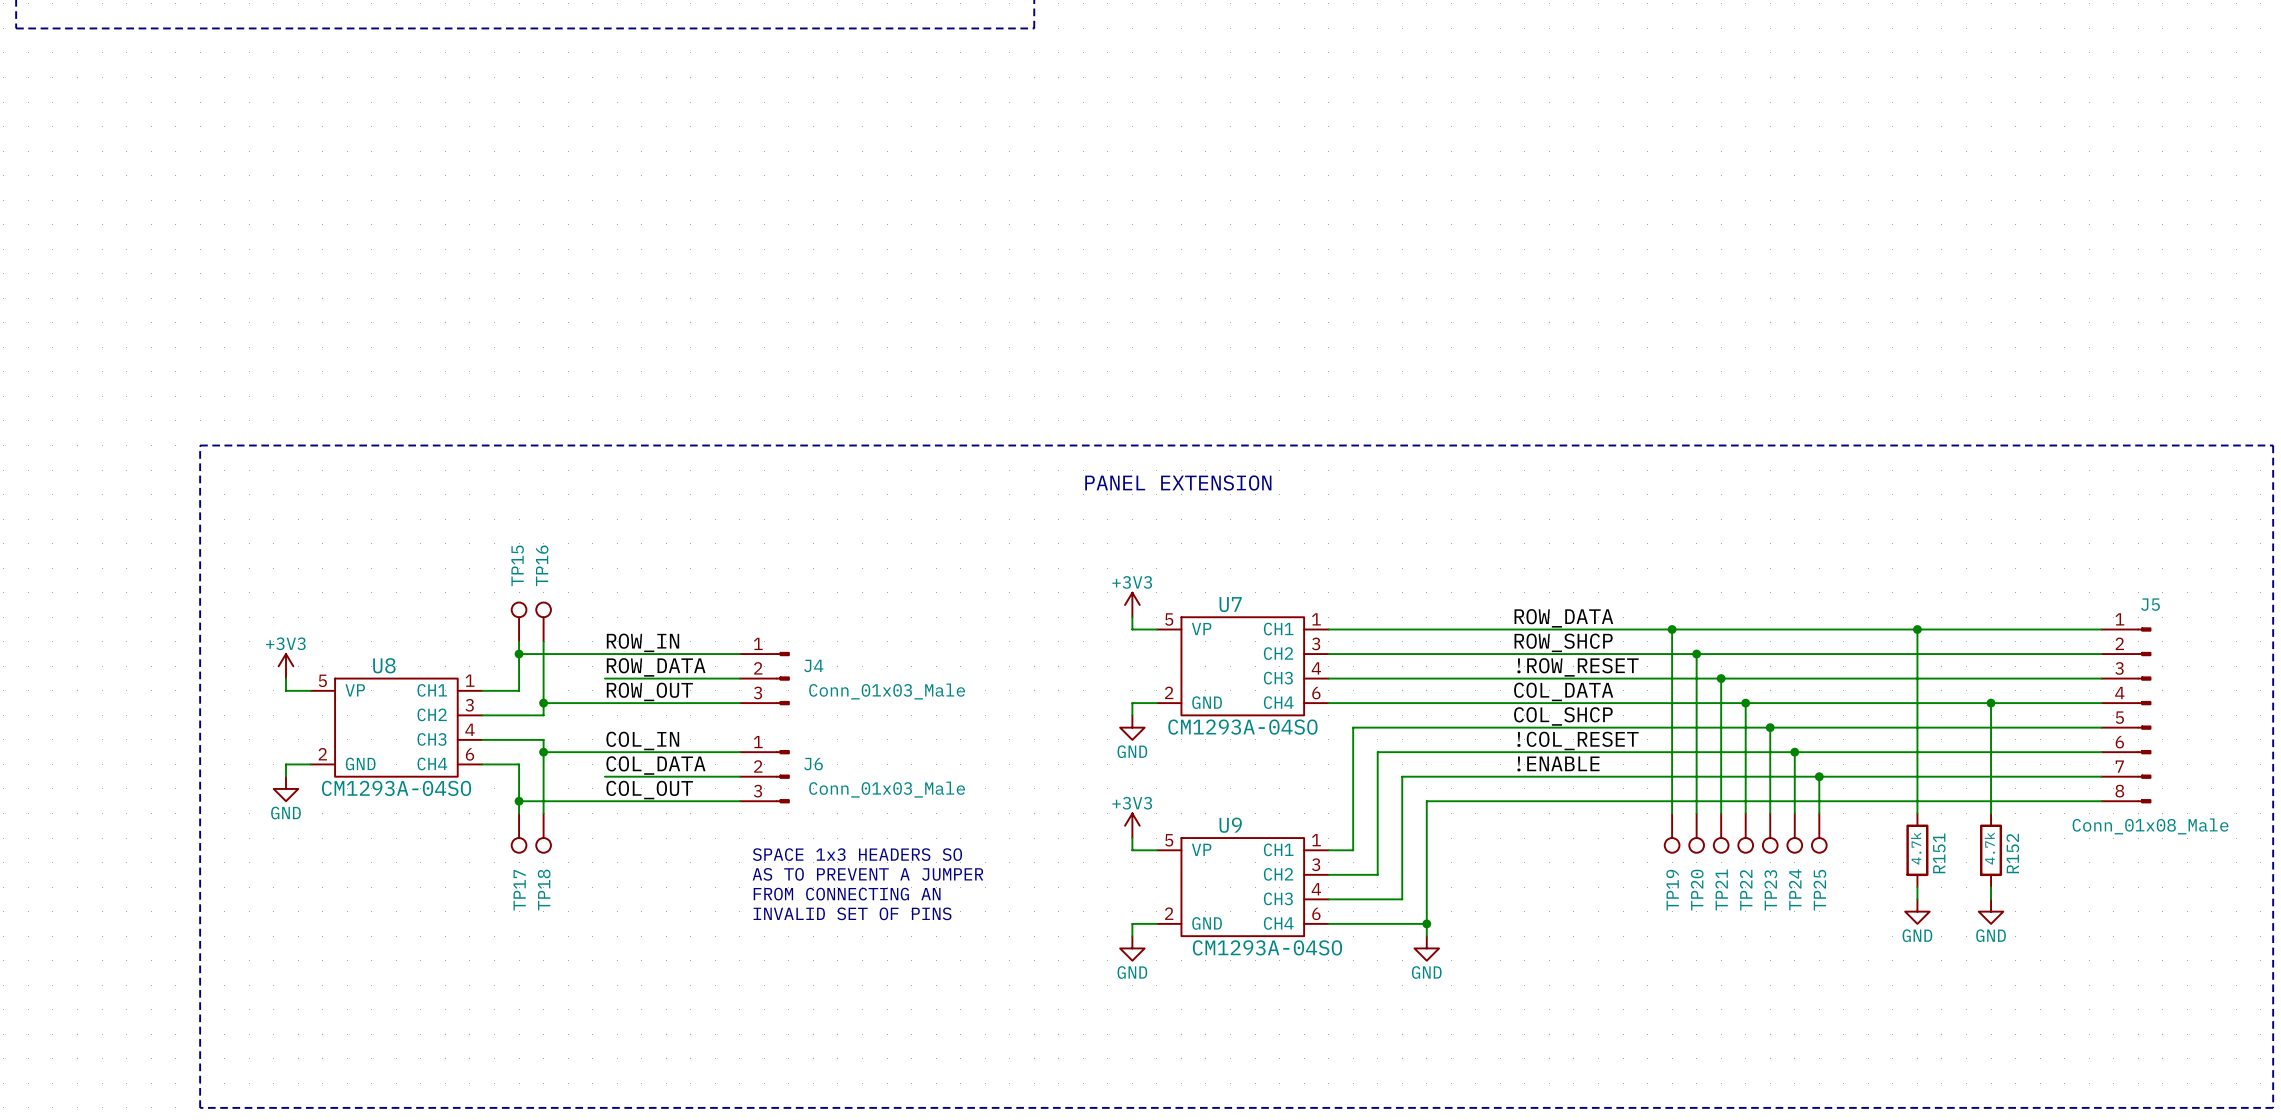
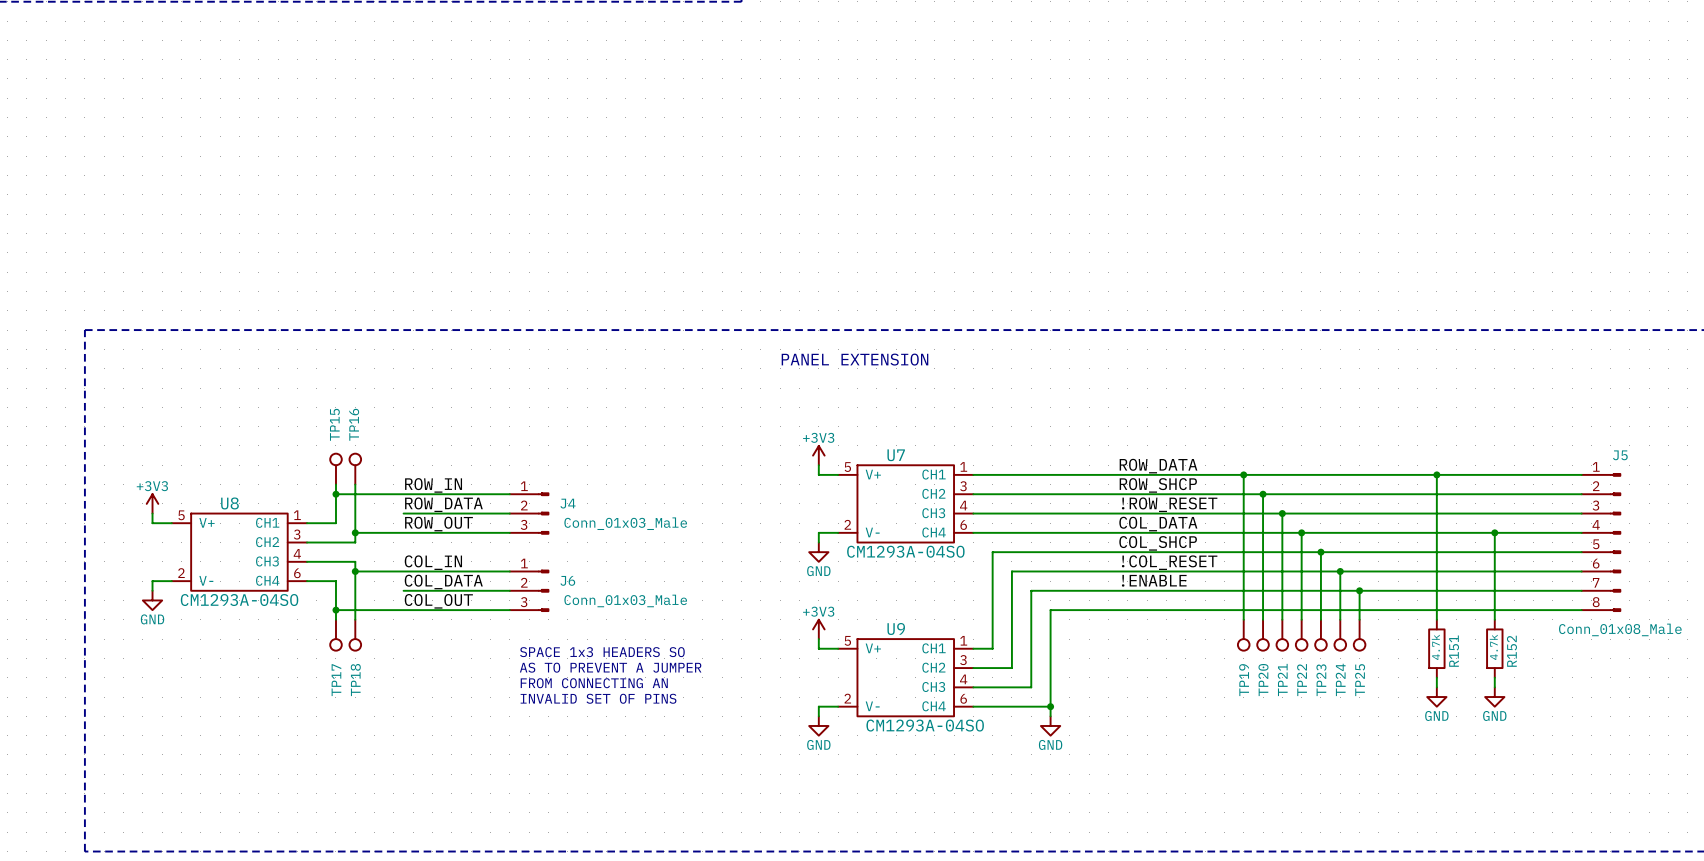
U7 pin name: VP (1201, 629) -> V+ (873, 474)
U8 pin name: VP (355, 690) -> V+ (206, 522)
U7 pin name: GND (1207, 702) -> V- (872, 532)
U8 pin name: GND (360, 763) -> V- (206, 580)
U9 pin name: VP (1201, 849) -> V+ (873, 648)
U9 pin name: GND (1207, 923) -> V- (872, 706)

